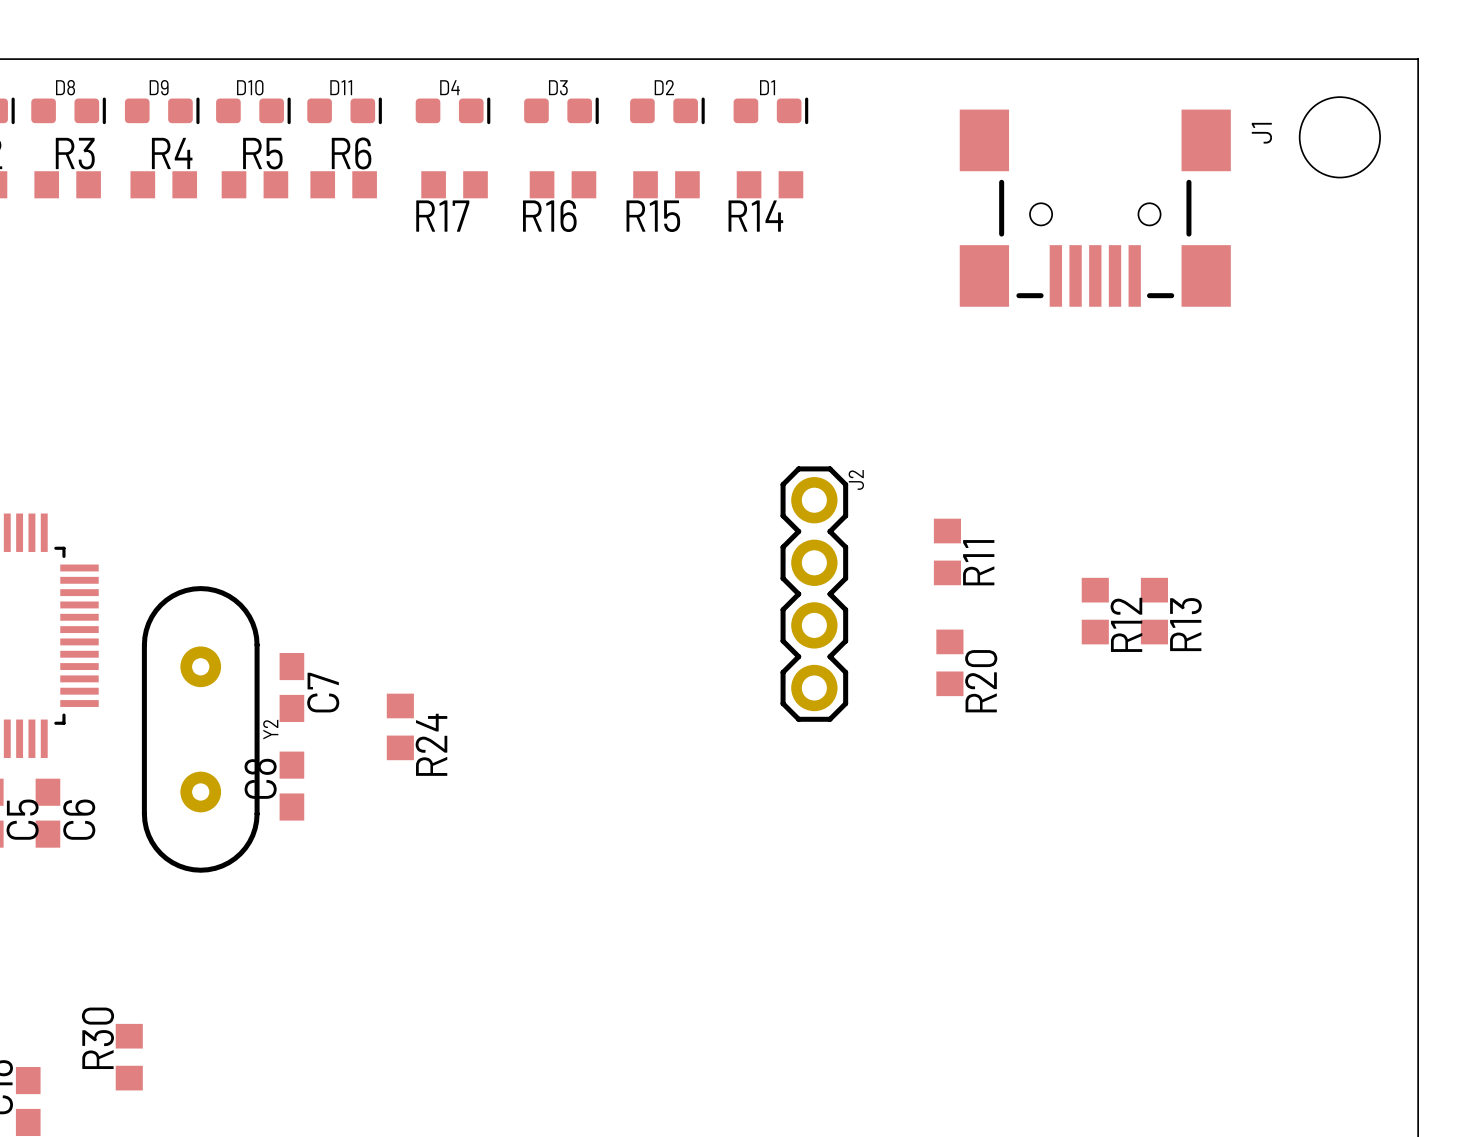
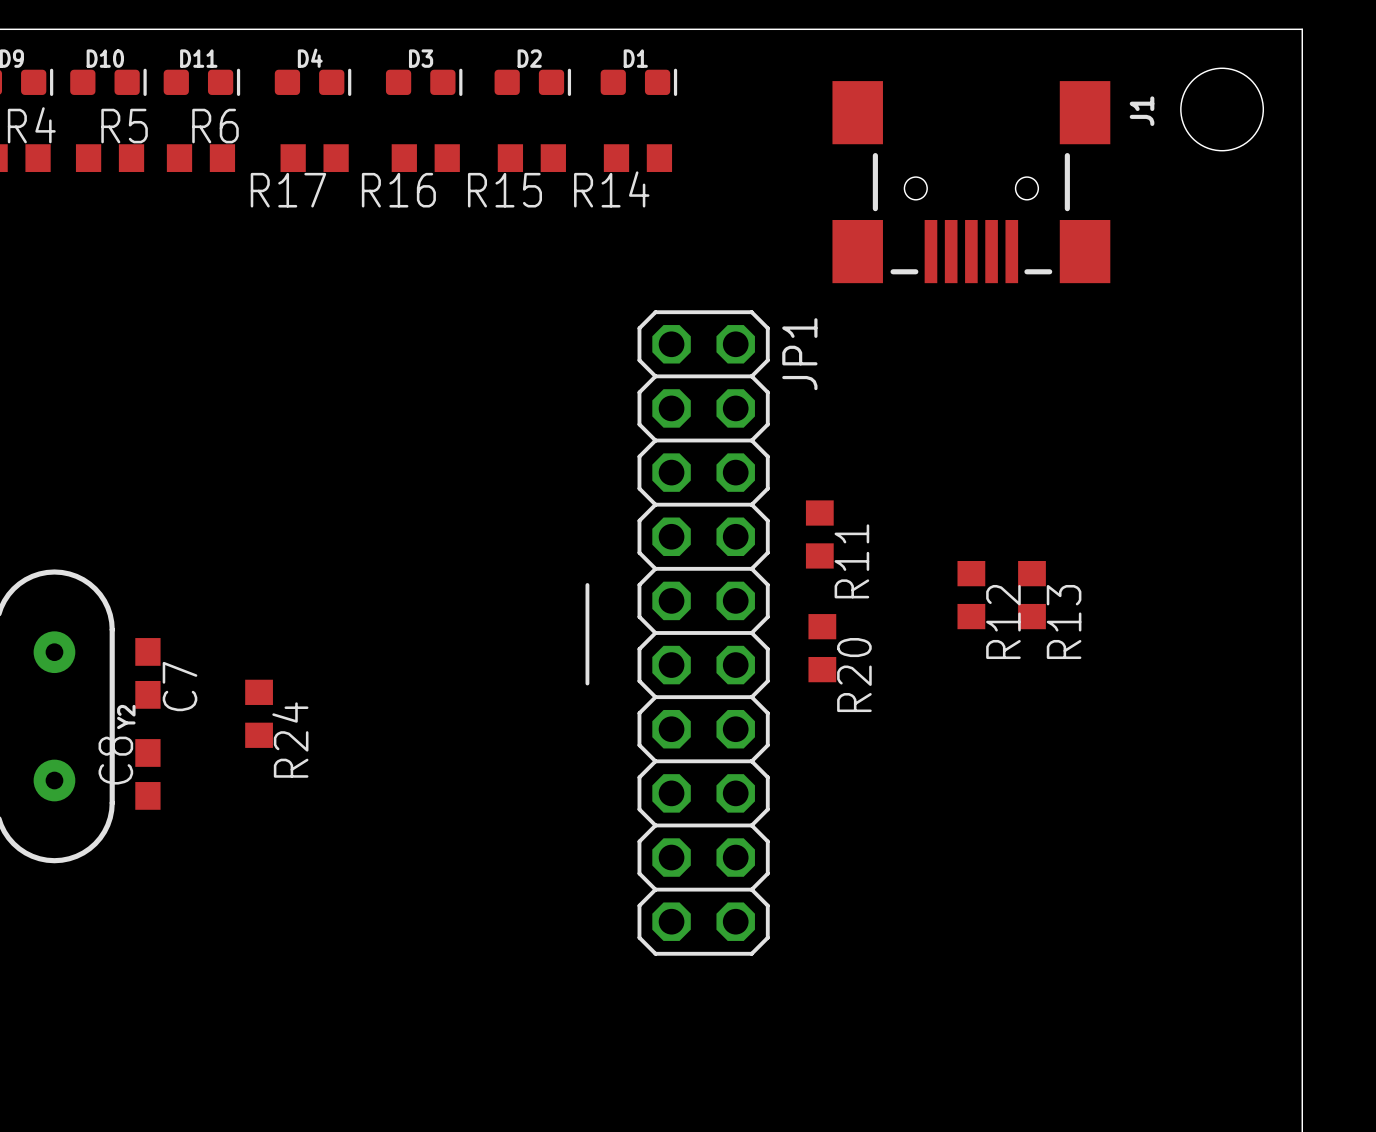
J2: (814, 594) -> none
line: none -> (587, 585) (587, 683)
JP1: none -> (703, 632)

